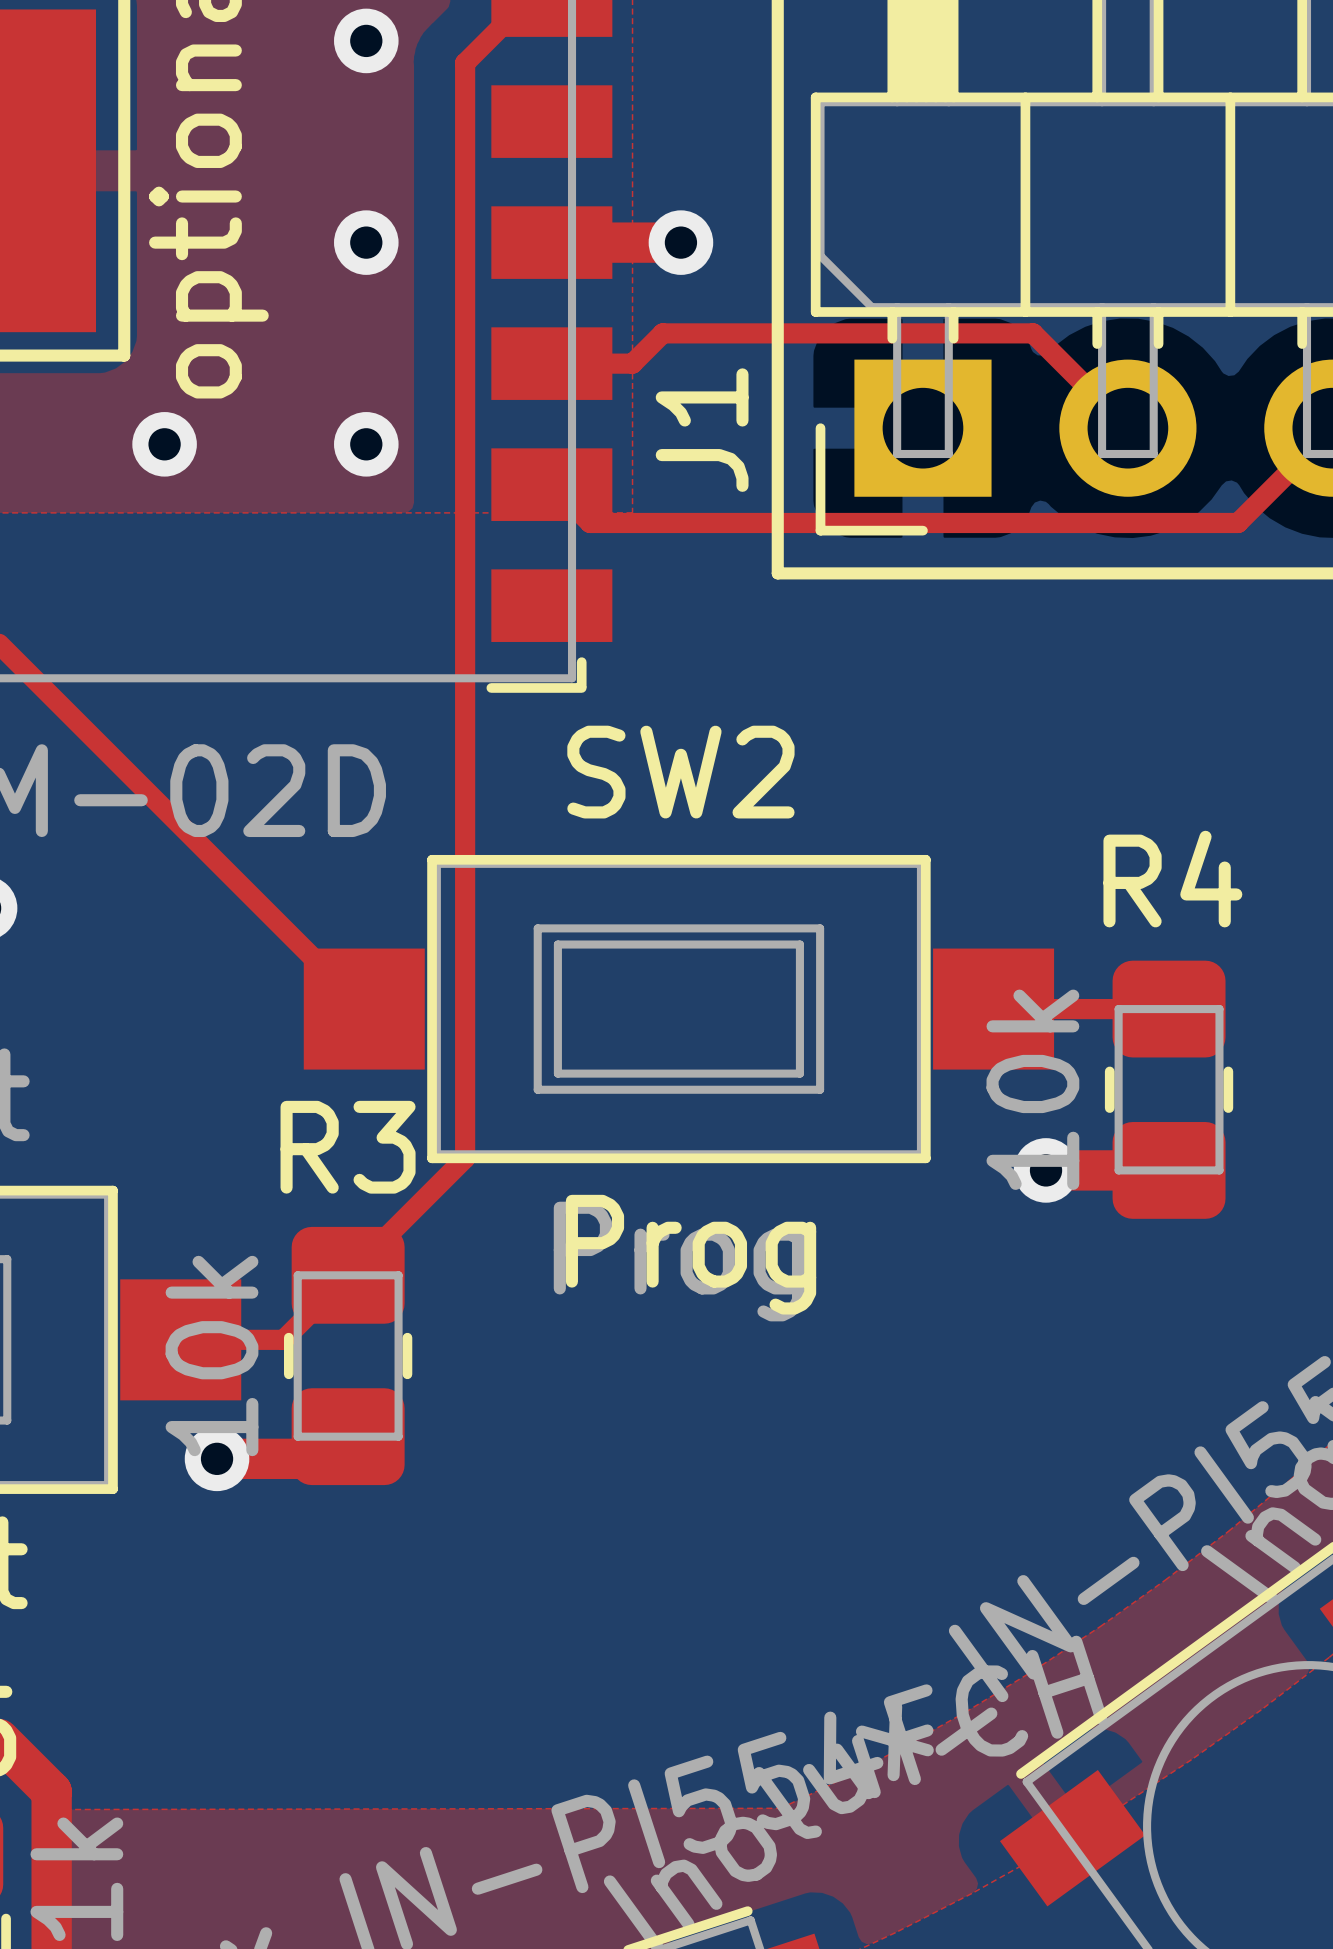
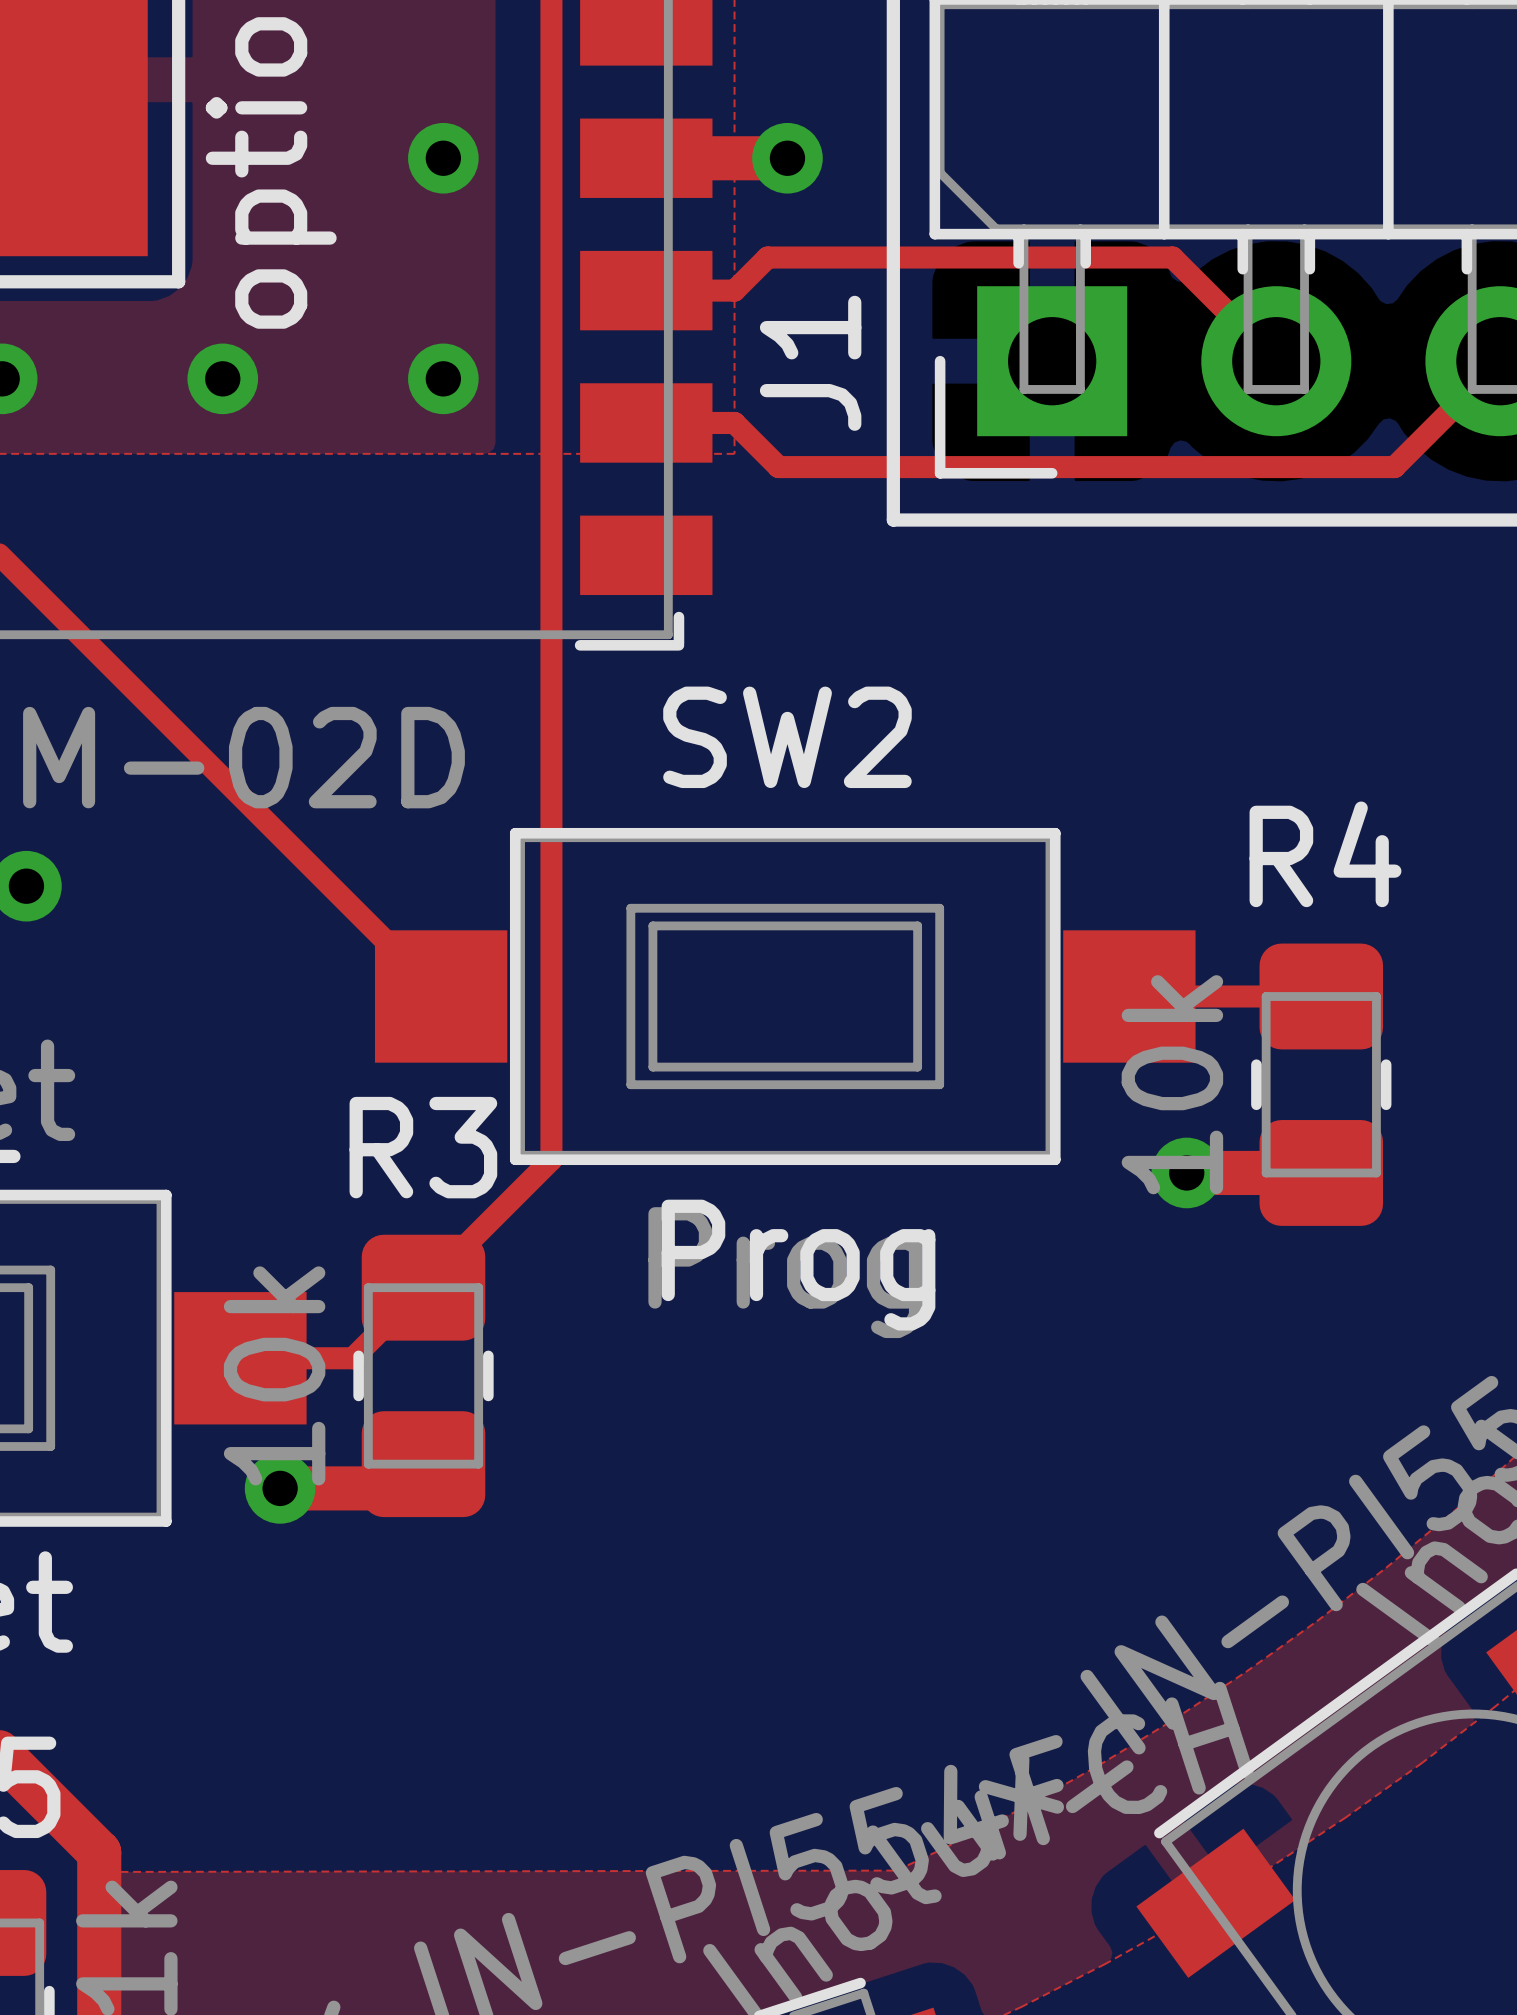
top track: (551, 484) (590, 522) (1238, 522) -> (646, 422) (734, 422) (778, 467) (1394, 467) (1396, 464)

